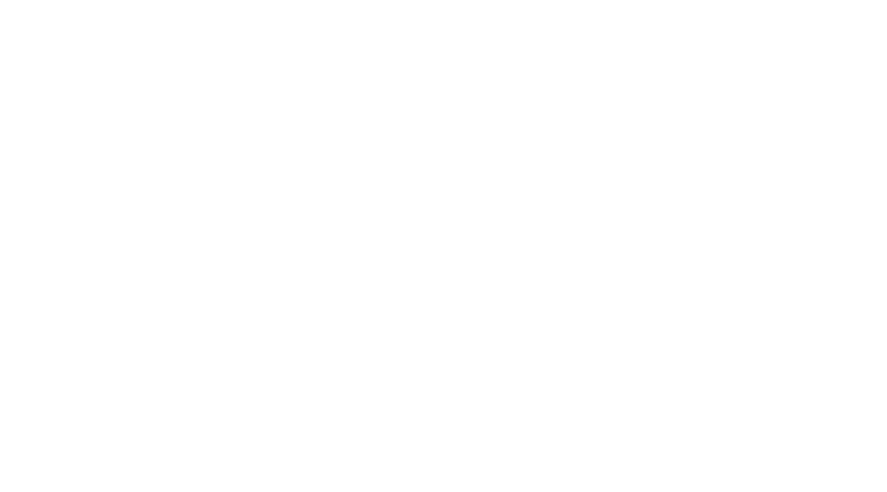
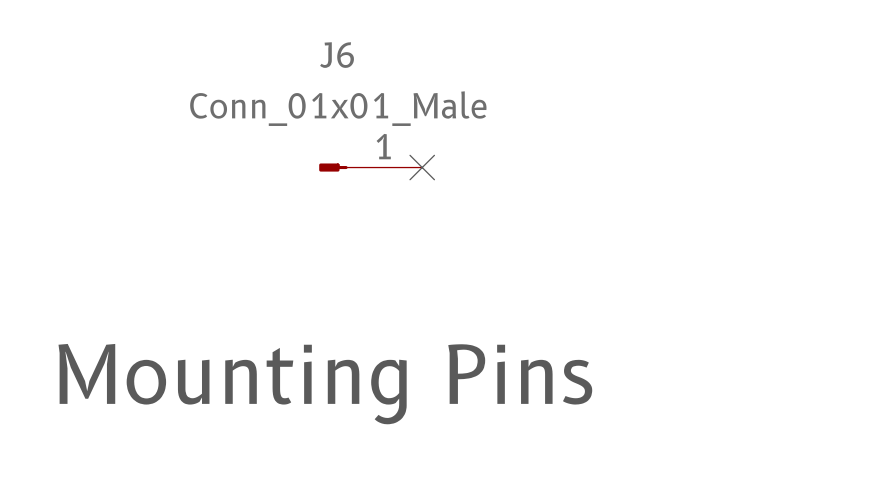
J6: none -> Conn_01x01_Male (370, 167)
no-connect mark: none -> (422, 167)
text: none -> Mounting Pins (325, 384)

